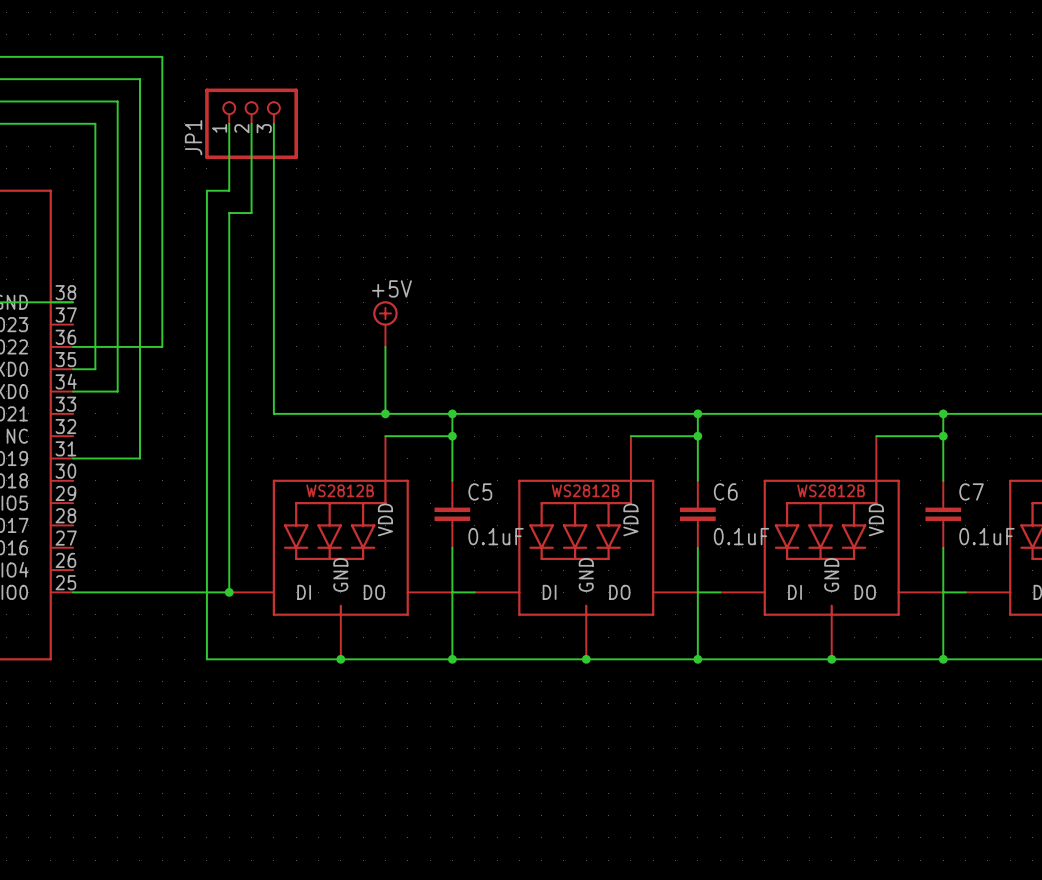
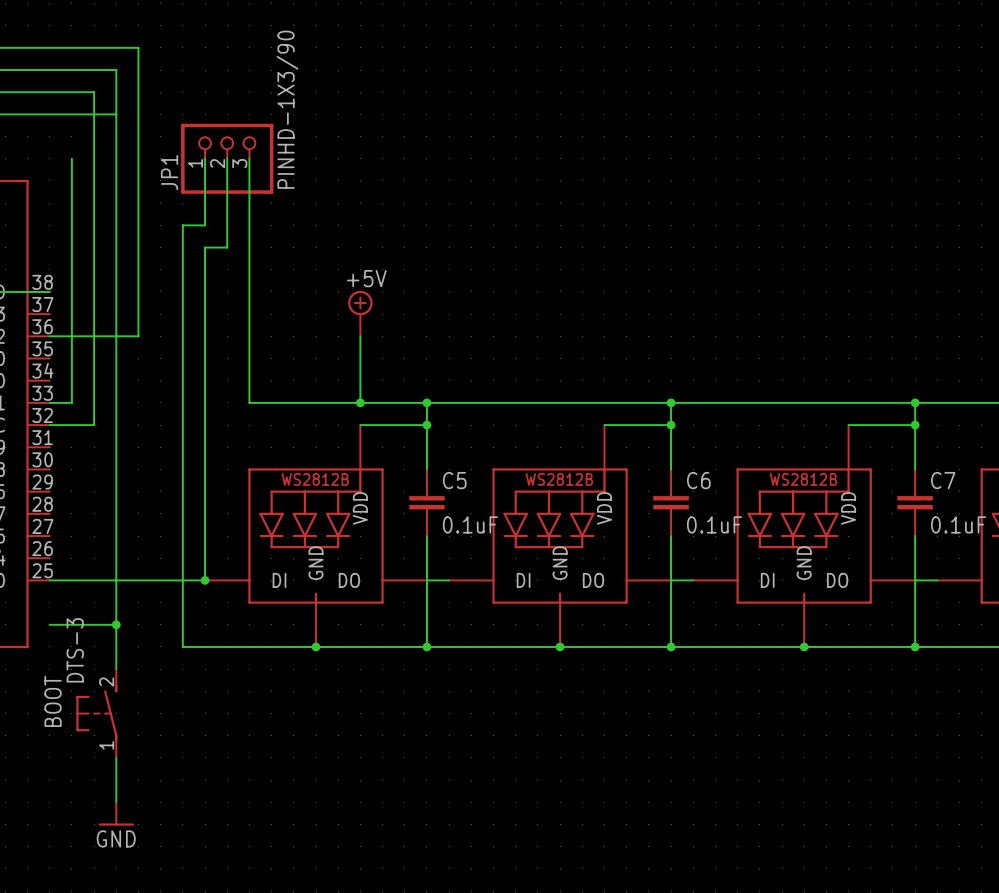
JP1 value: none -> PINHD-1X3/90 (287, 109)
wire: (95, 123) (95, 168) -> (71, 114) (116, 114)
wire: (229, 123) (229, 168) -> none
wire: (251, 123) (251, 168) -> none
JP1 position: (251, 123) -> (227, 158)
wire: (273, 123) (273, 168) -> none
wire: (229, 190) (206, 190) (206, 235) -> (205, 225) (182, 225)
wire: (229, 213) (251, 213) -> (205, 203) (205, 180)
wire: (229, 235) (229, 257) -> (227, 203) (227, 247) (205, 247)
wire: (73, 369) (95, 369) -> (49, 402) (71, 402) (71, 358)
wire: (73, 391) (117, 391) -> (49, 425) (94, 425) (94, 380)
wire: (73, 458) (139, 458) -> (116, 669) (116, 447)
wire: none -> (49, 624) (116, 624)
junction: none -> (116, 624)
BOOT: none -> DTS-3 (96, 713)
wire: none -> (116, 757) (116, 802)
power symbol: none -> GND (116, 813)

